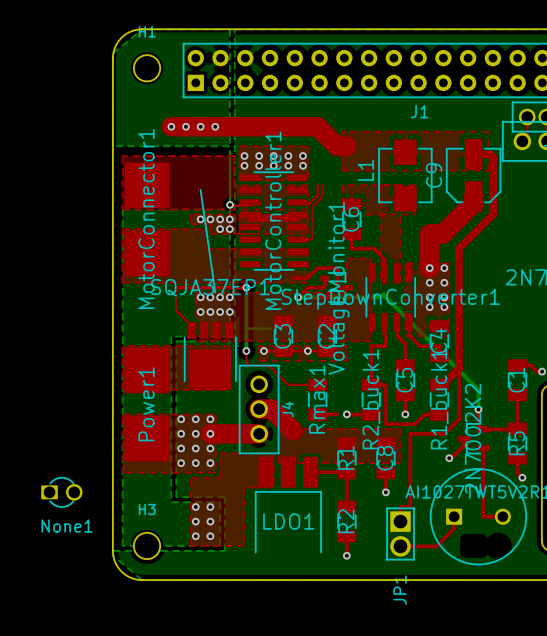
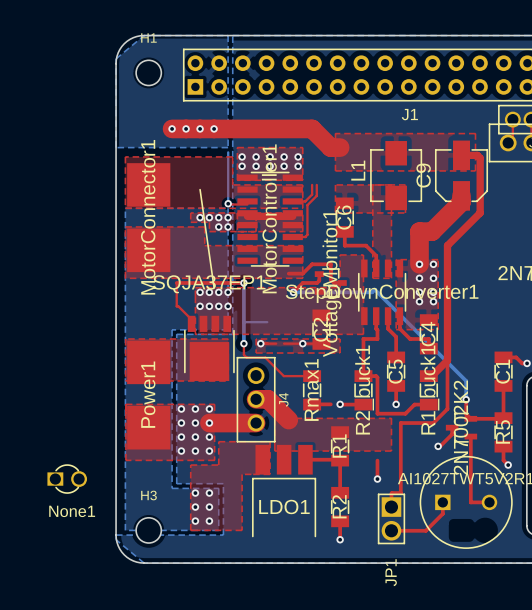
C3: (283, 336) -> none
C8: (385, 458) -> none

